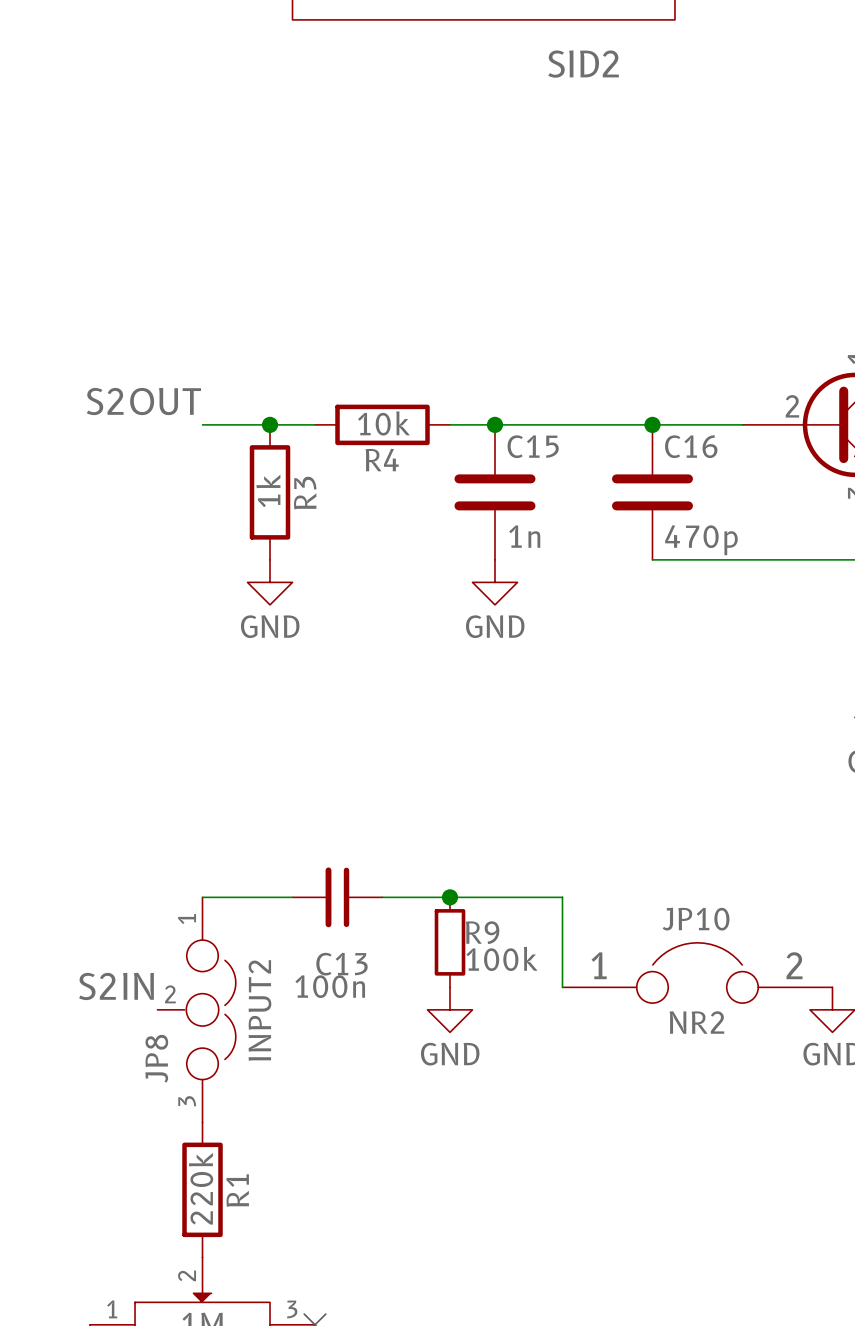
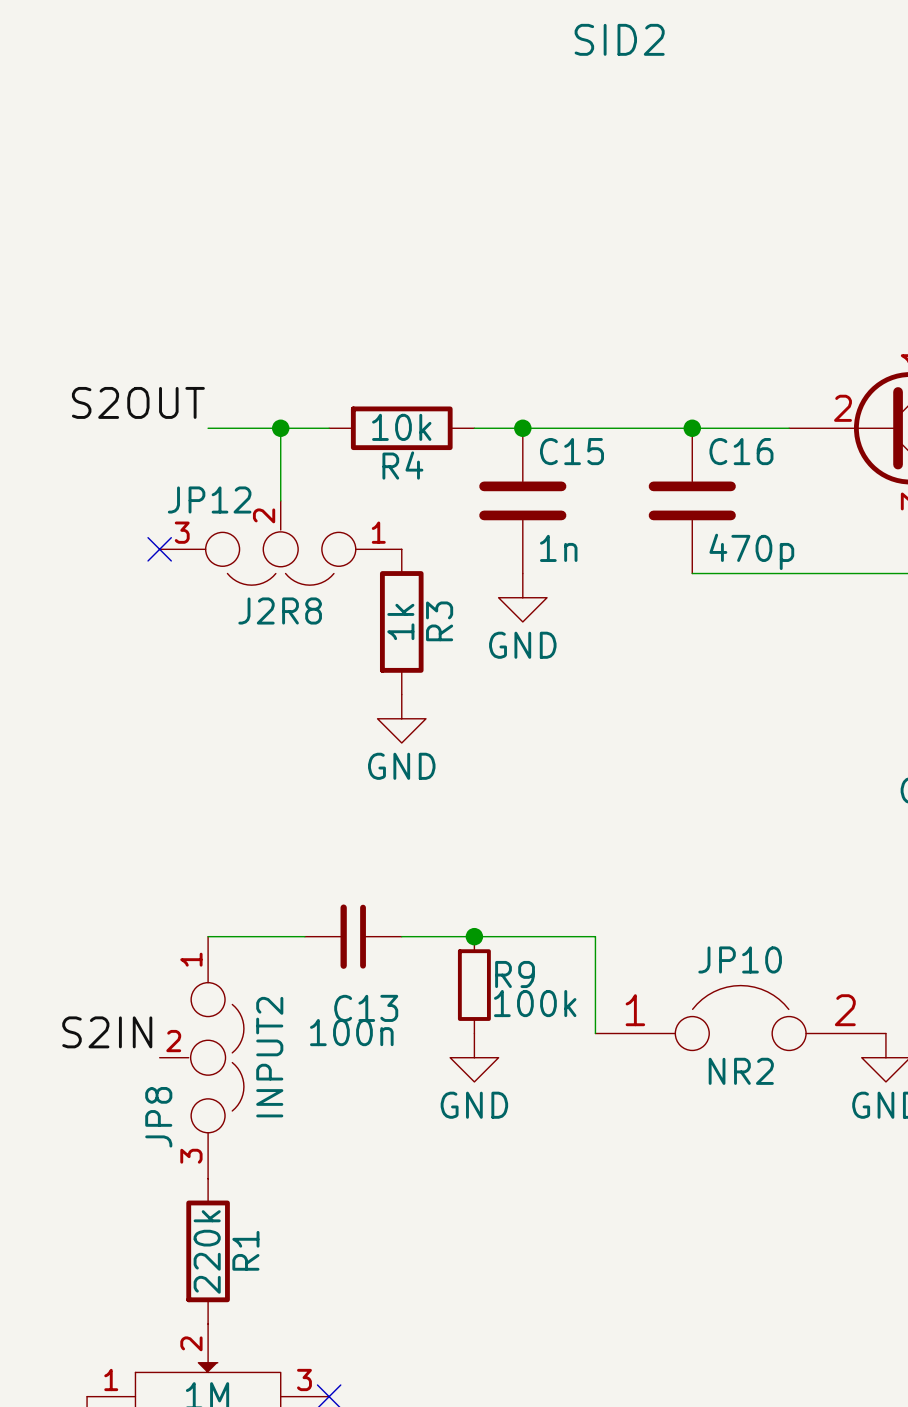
wire: none -> (280, 428) (280, 500)
R3 position: (270, 492) -> (401, 621)
JP12: none -> J2R8 (280, 543)
no-connect mark: none -> (159, 549)
power symbol position: GND (270, 582) -> GND (401, 718)

